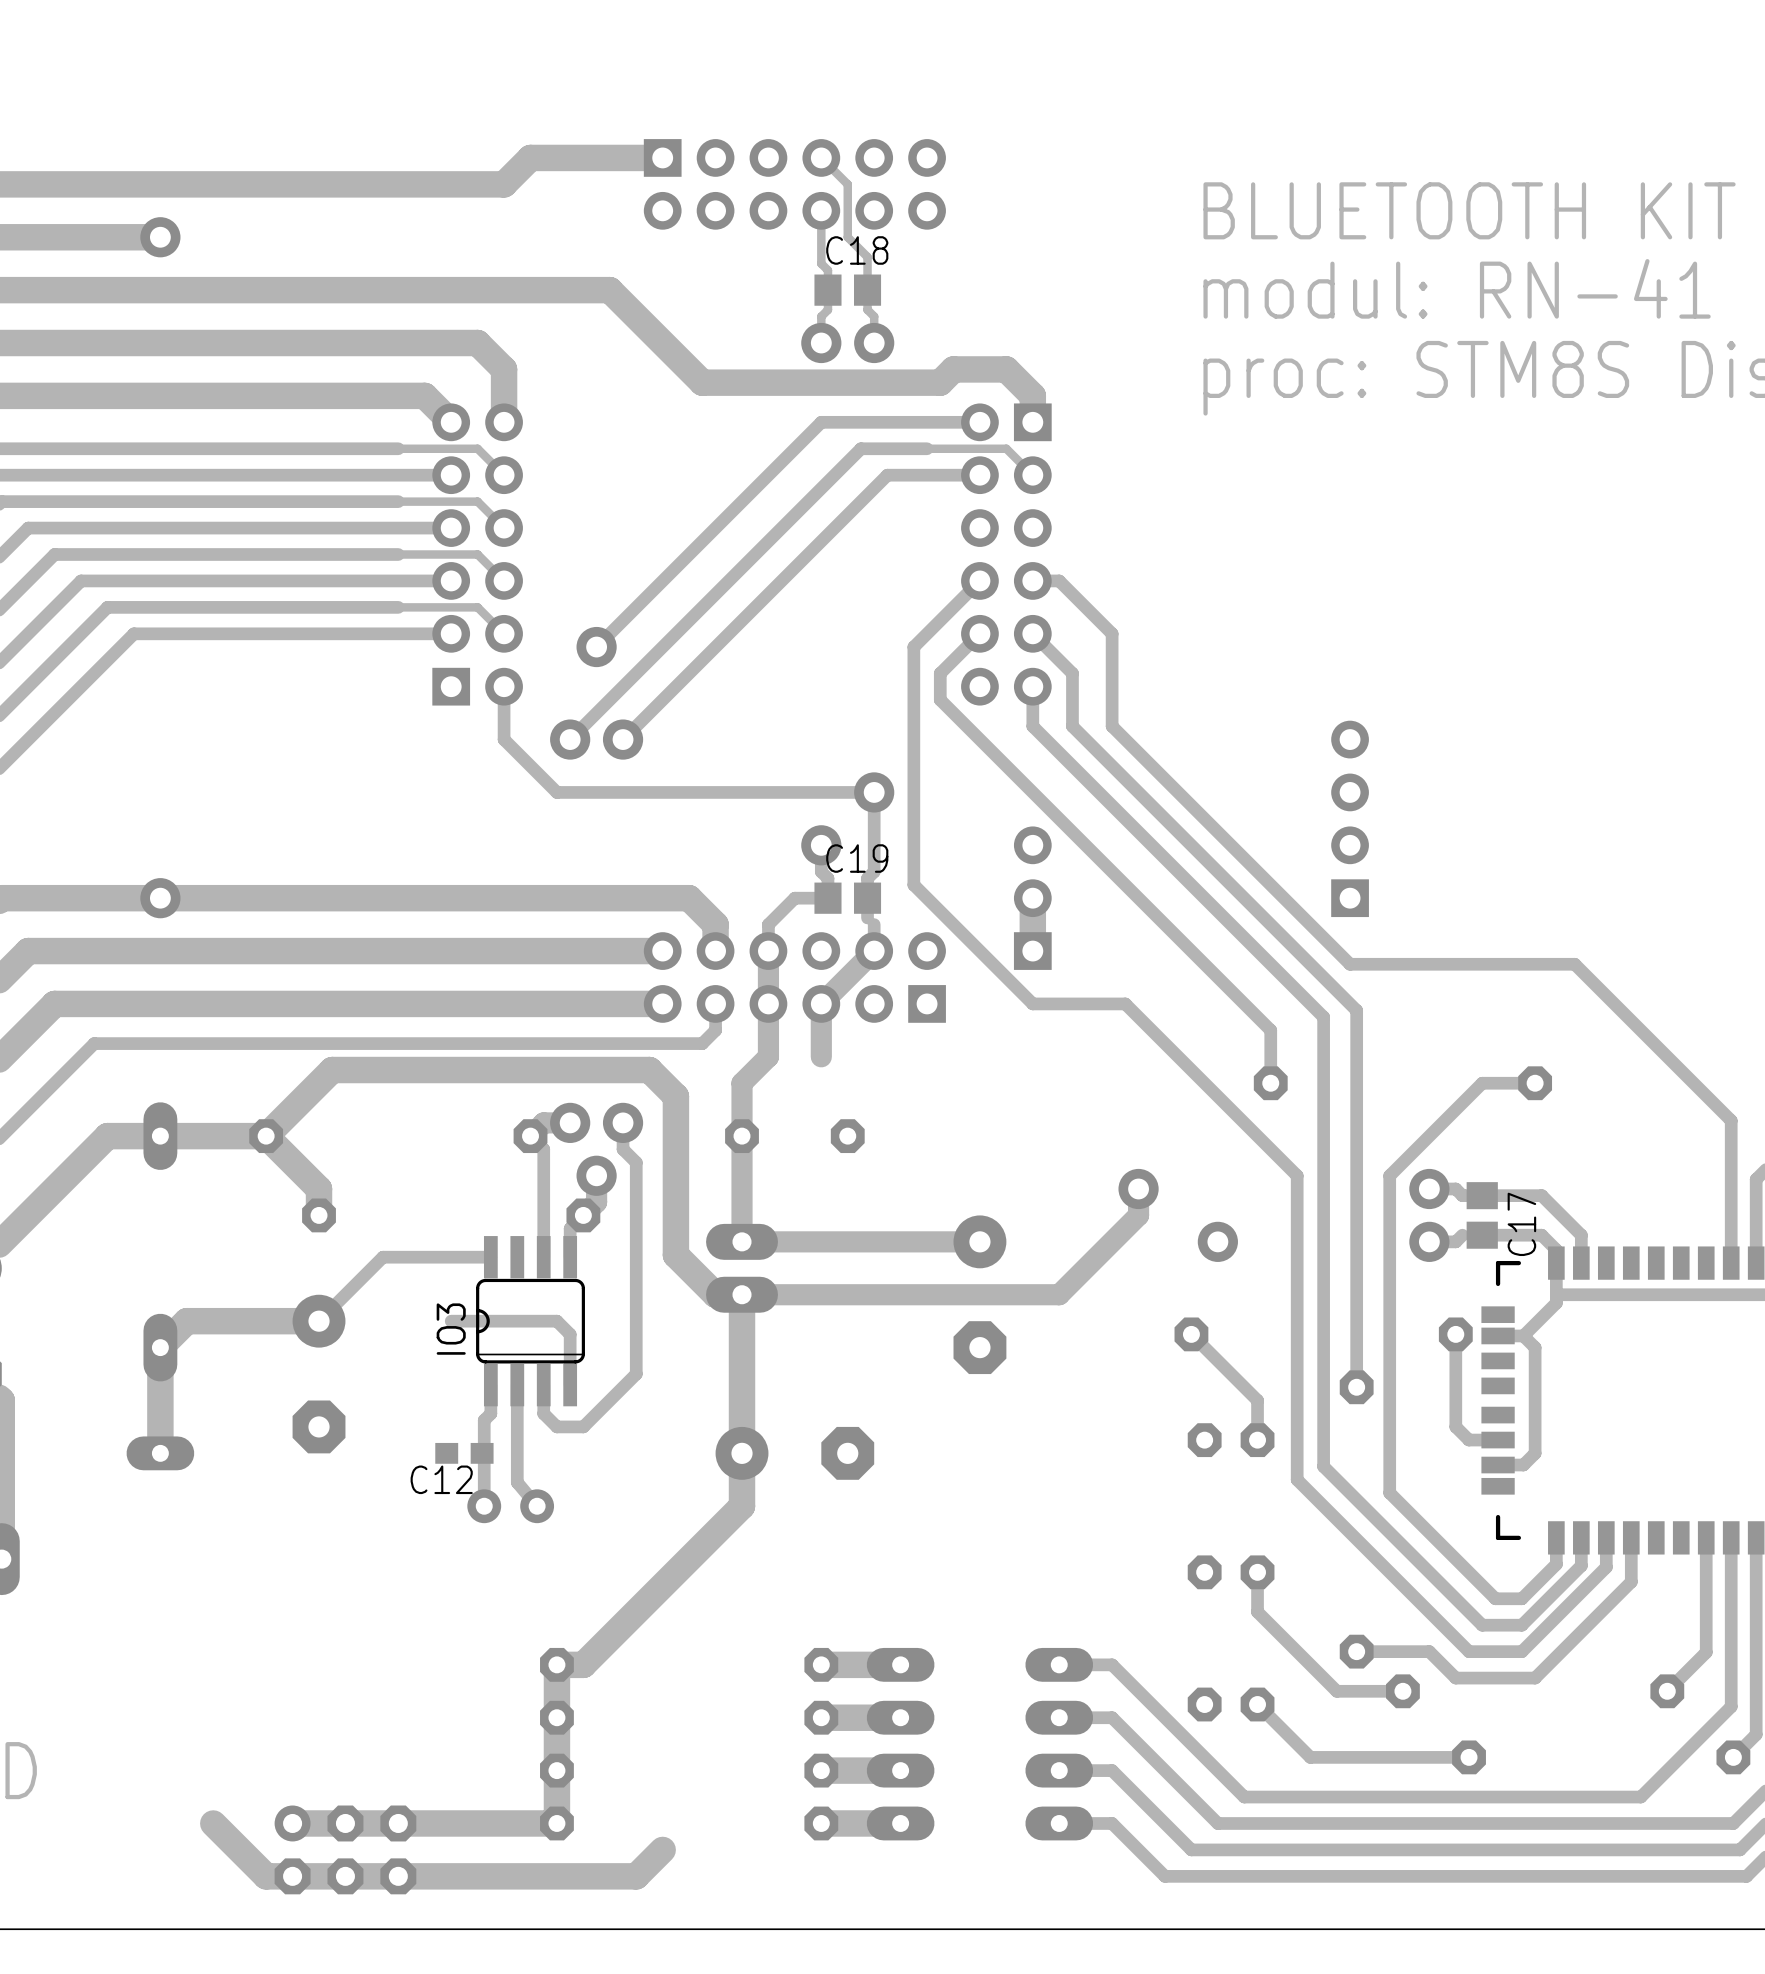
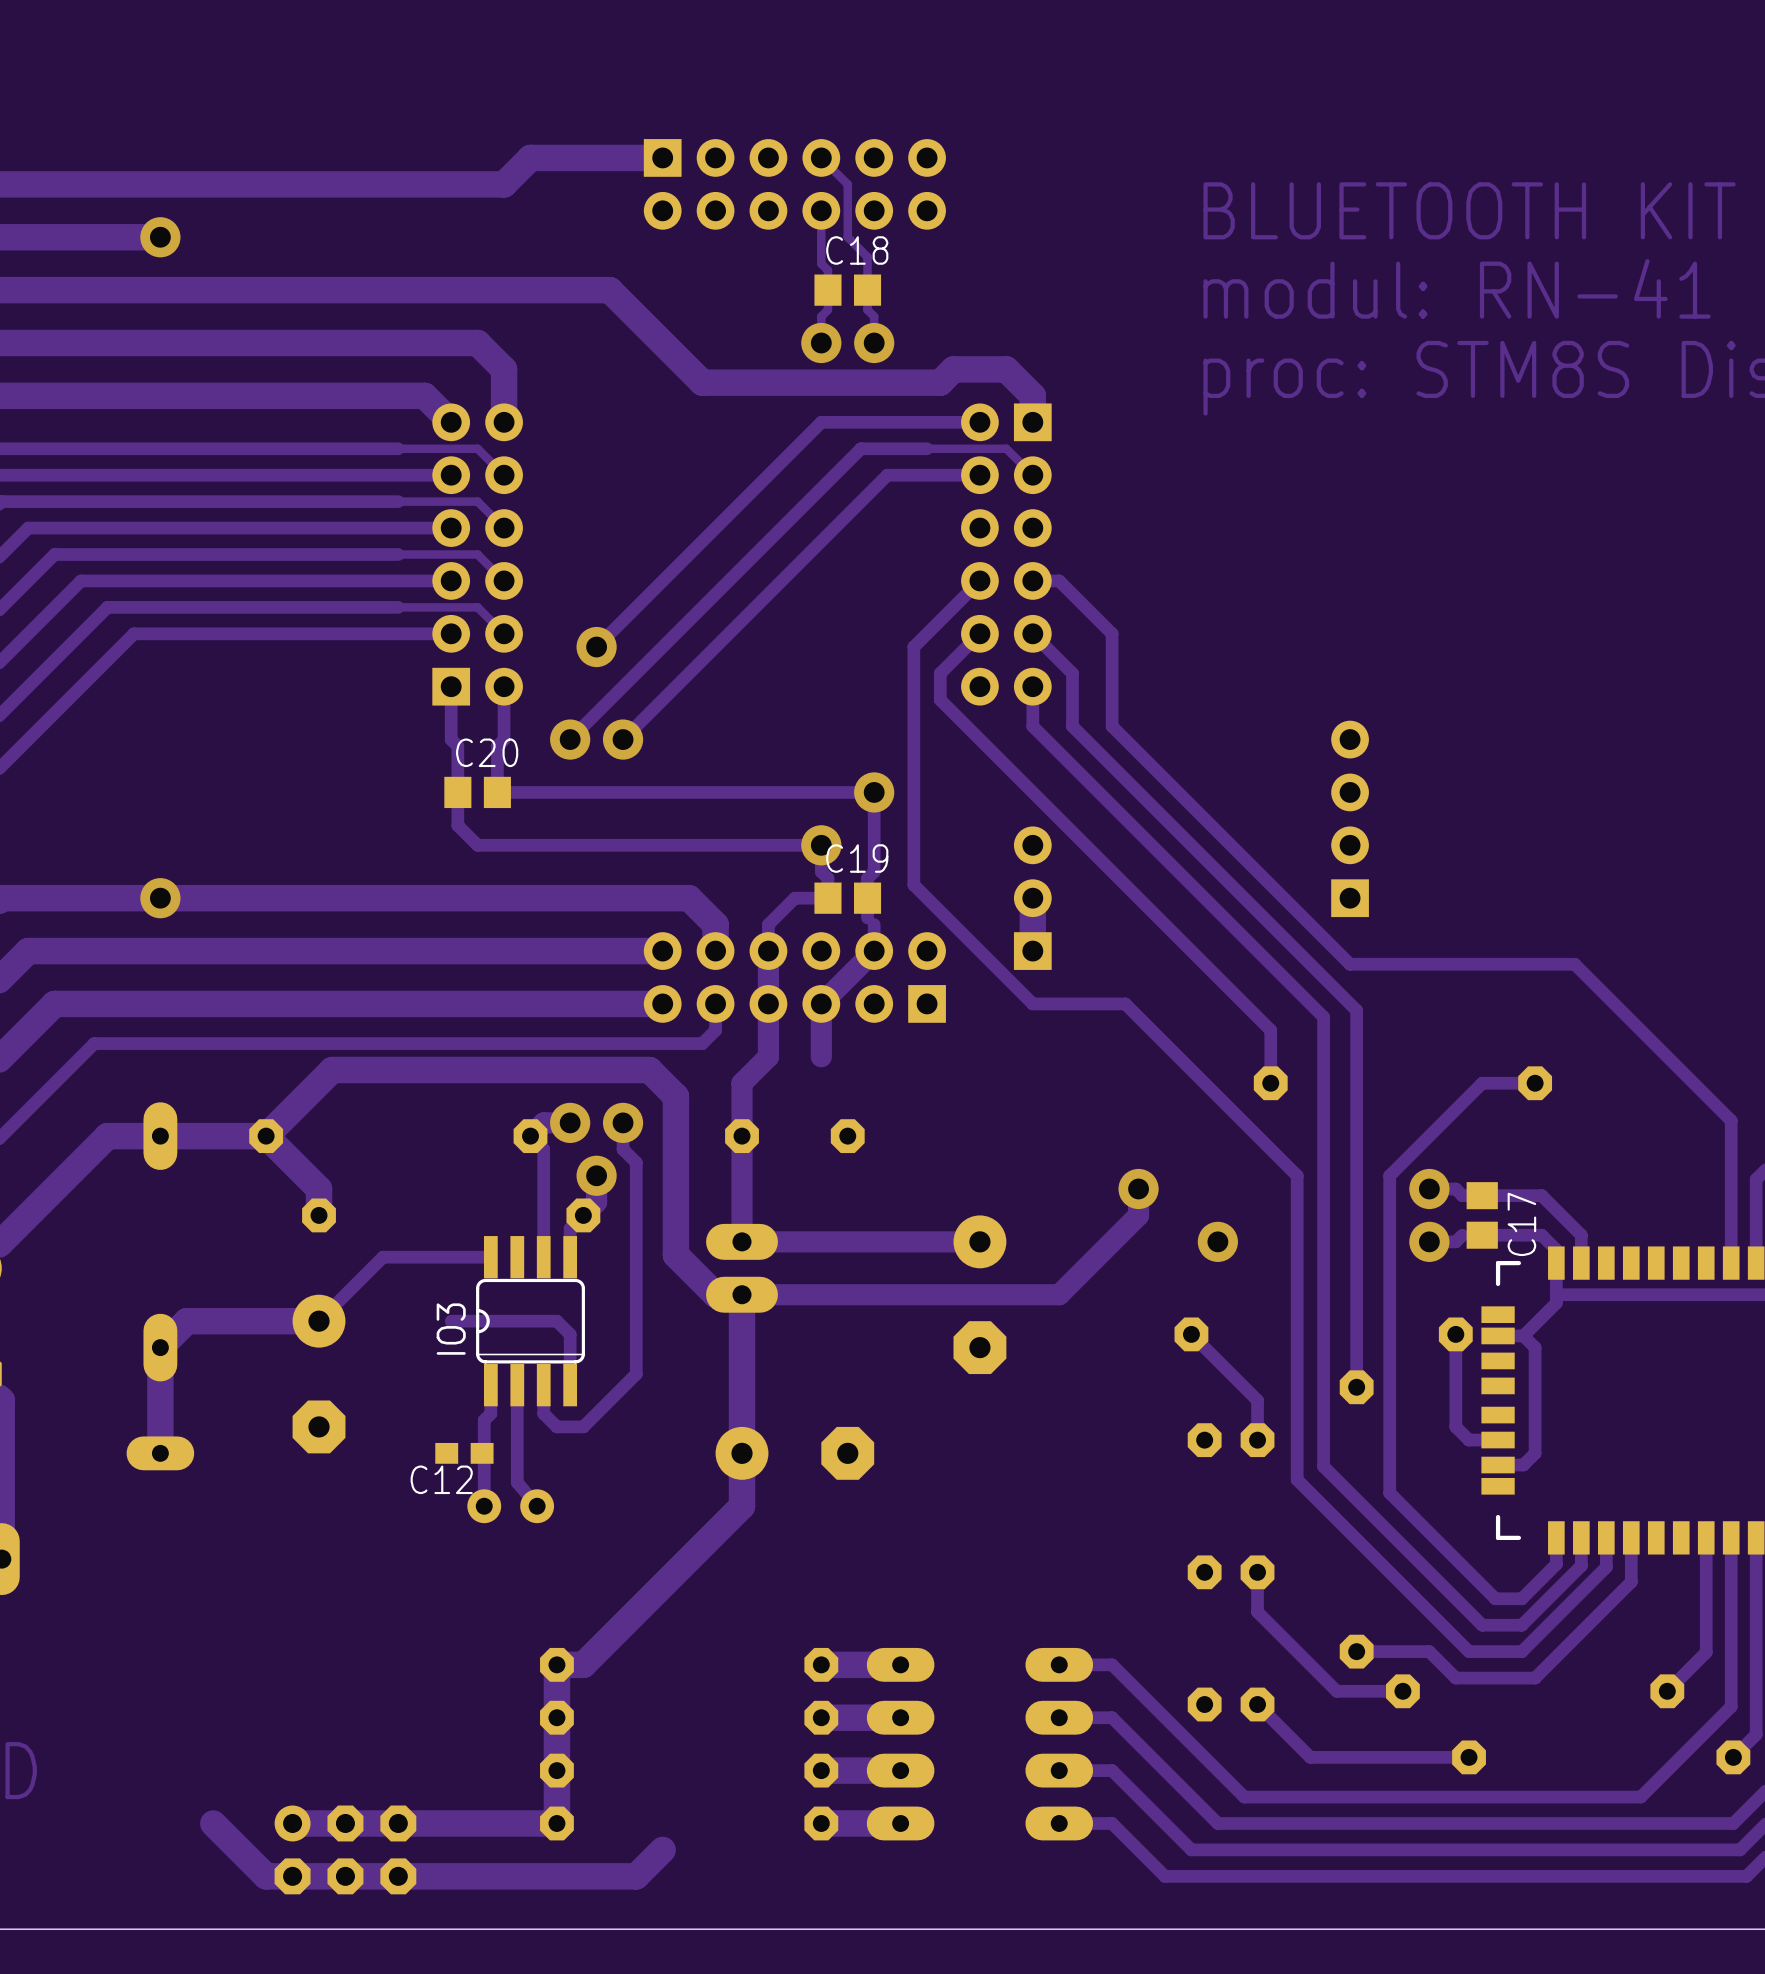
track: none -> (451, 686) (451, 739) (457, 746) (457, 825) (477, 845) (821, 845)
track: (504, 739) (556, 792) -> (504, 739) (497, 746) (497, 792) (556, 792)
C20: none -> (477, 792)

